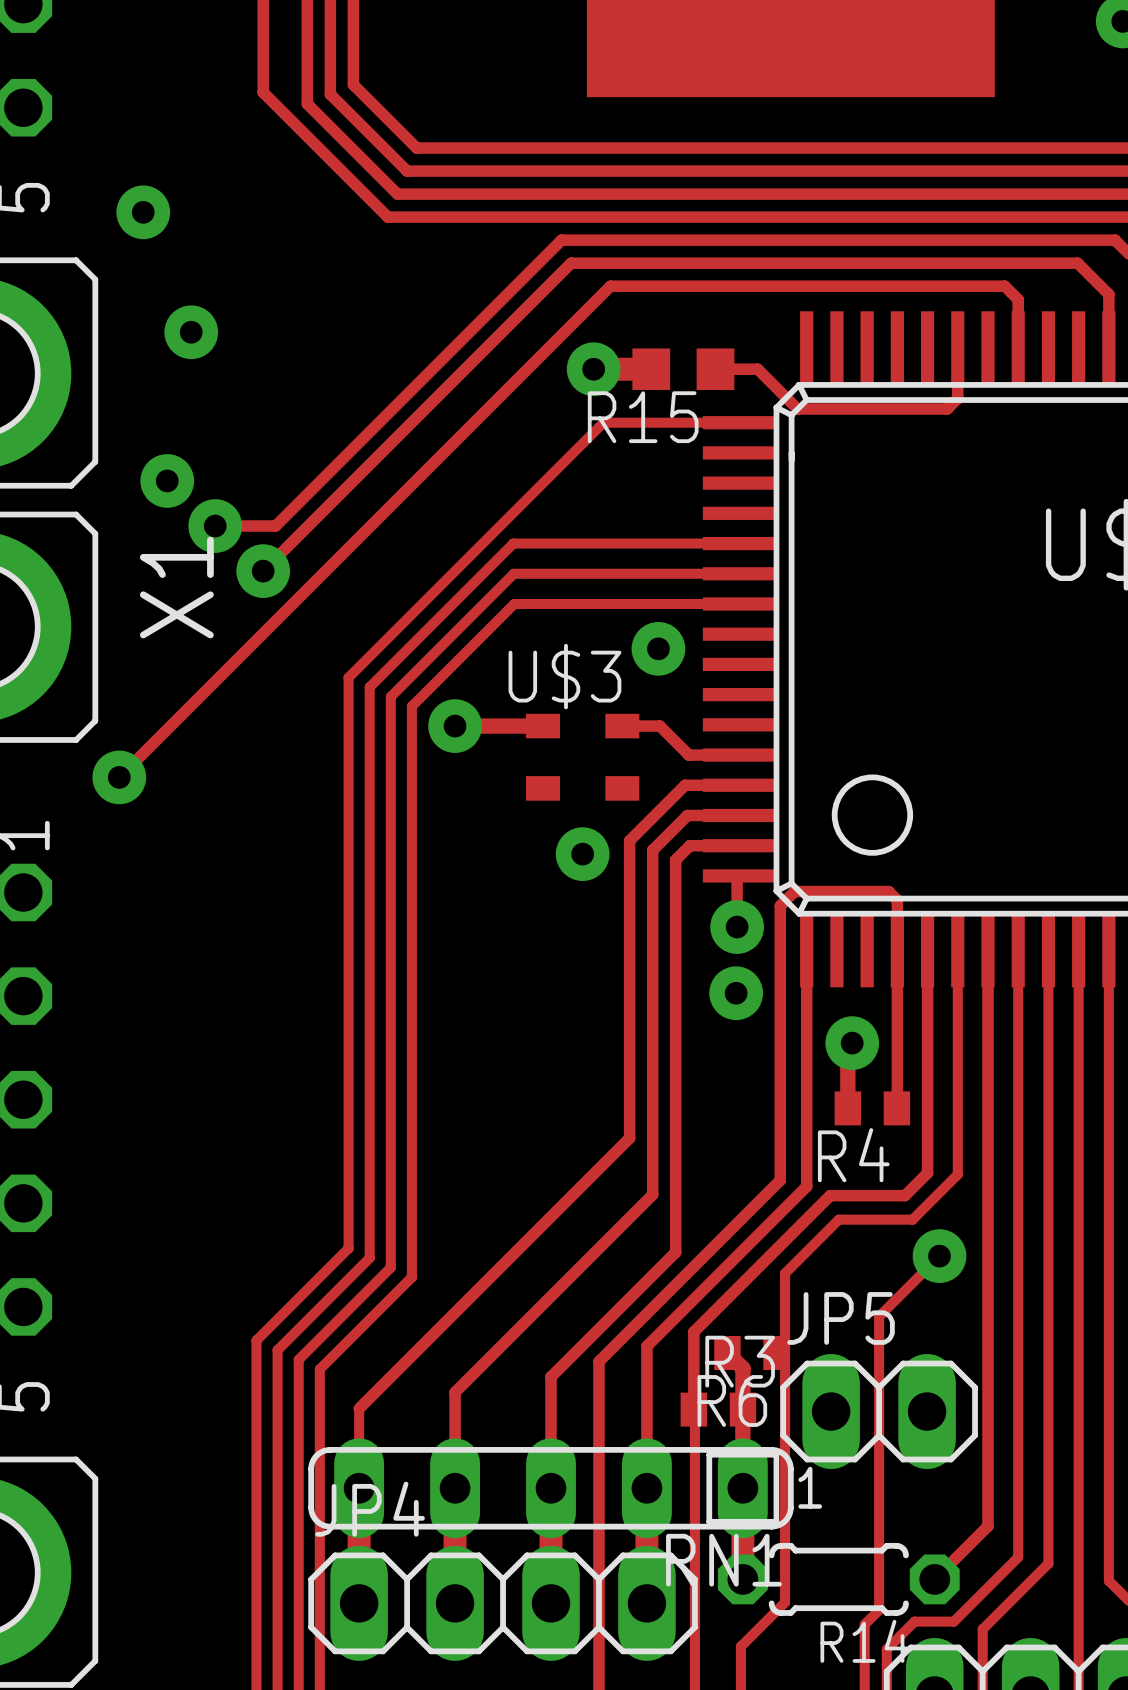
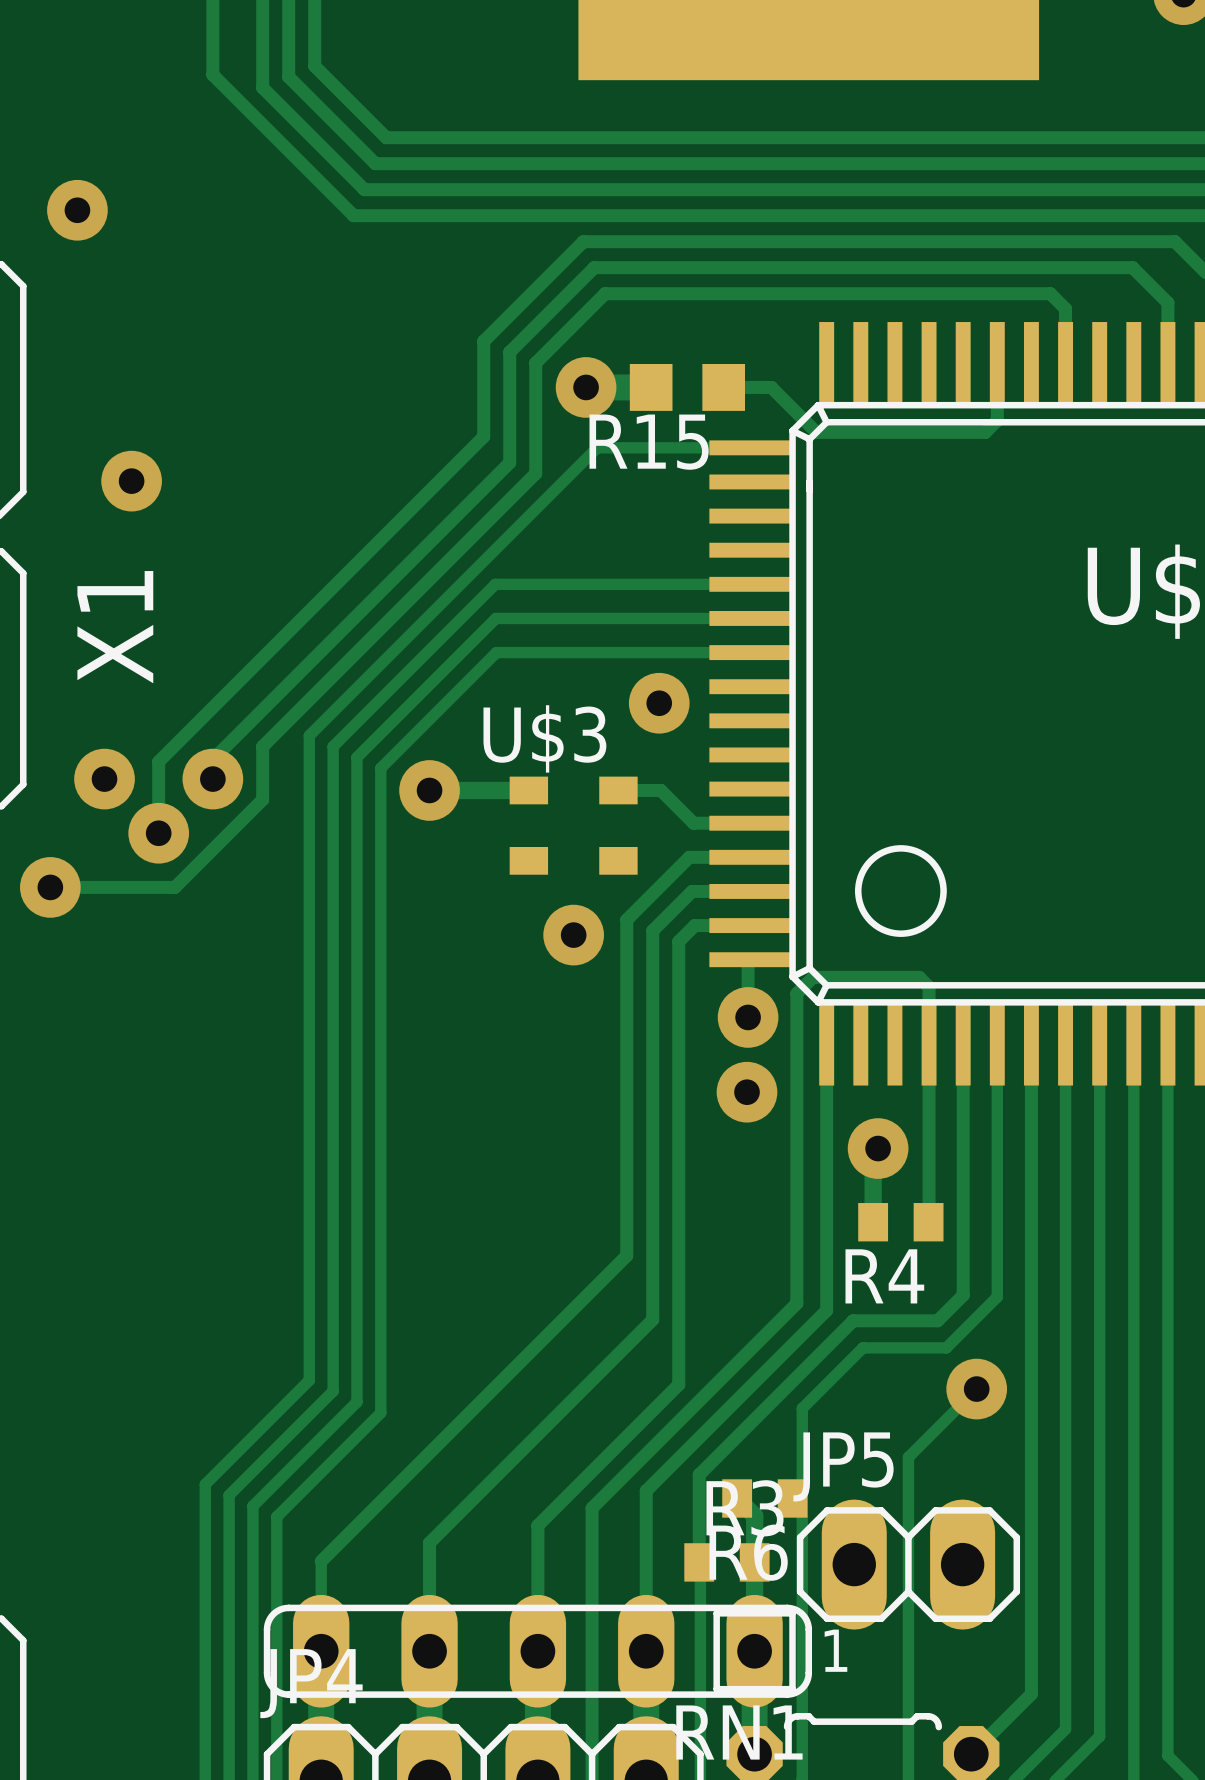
track: (591, 240) (561, 240) (275, 526) (215, 526) -> (583, 241) (483, 341) (483, 436) (158, 761) (158, 833)
track: (600, 263) (571, 263) (263, 571) -> (594, 267) (509, 352) (509, 462) (212, 759) (212, 779)
via: (191, 332) -> none
track: (549, 347) (119, 777) -> (535, 363) (535, 473) (262, 746) (262, 799) (174, 887) (50, 887)
via position: (167, 480) -> (131, 481)
via: (215, 526) -> none
via: (263, 571) -> none
via: none -> (104, 779)
via: none -> (212, 779)
via: none -> (158, 833)
via position: (119, 777) -> (50, 887)

